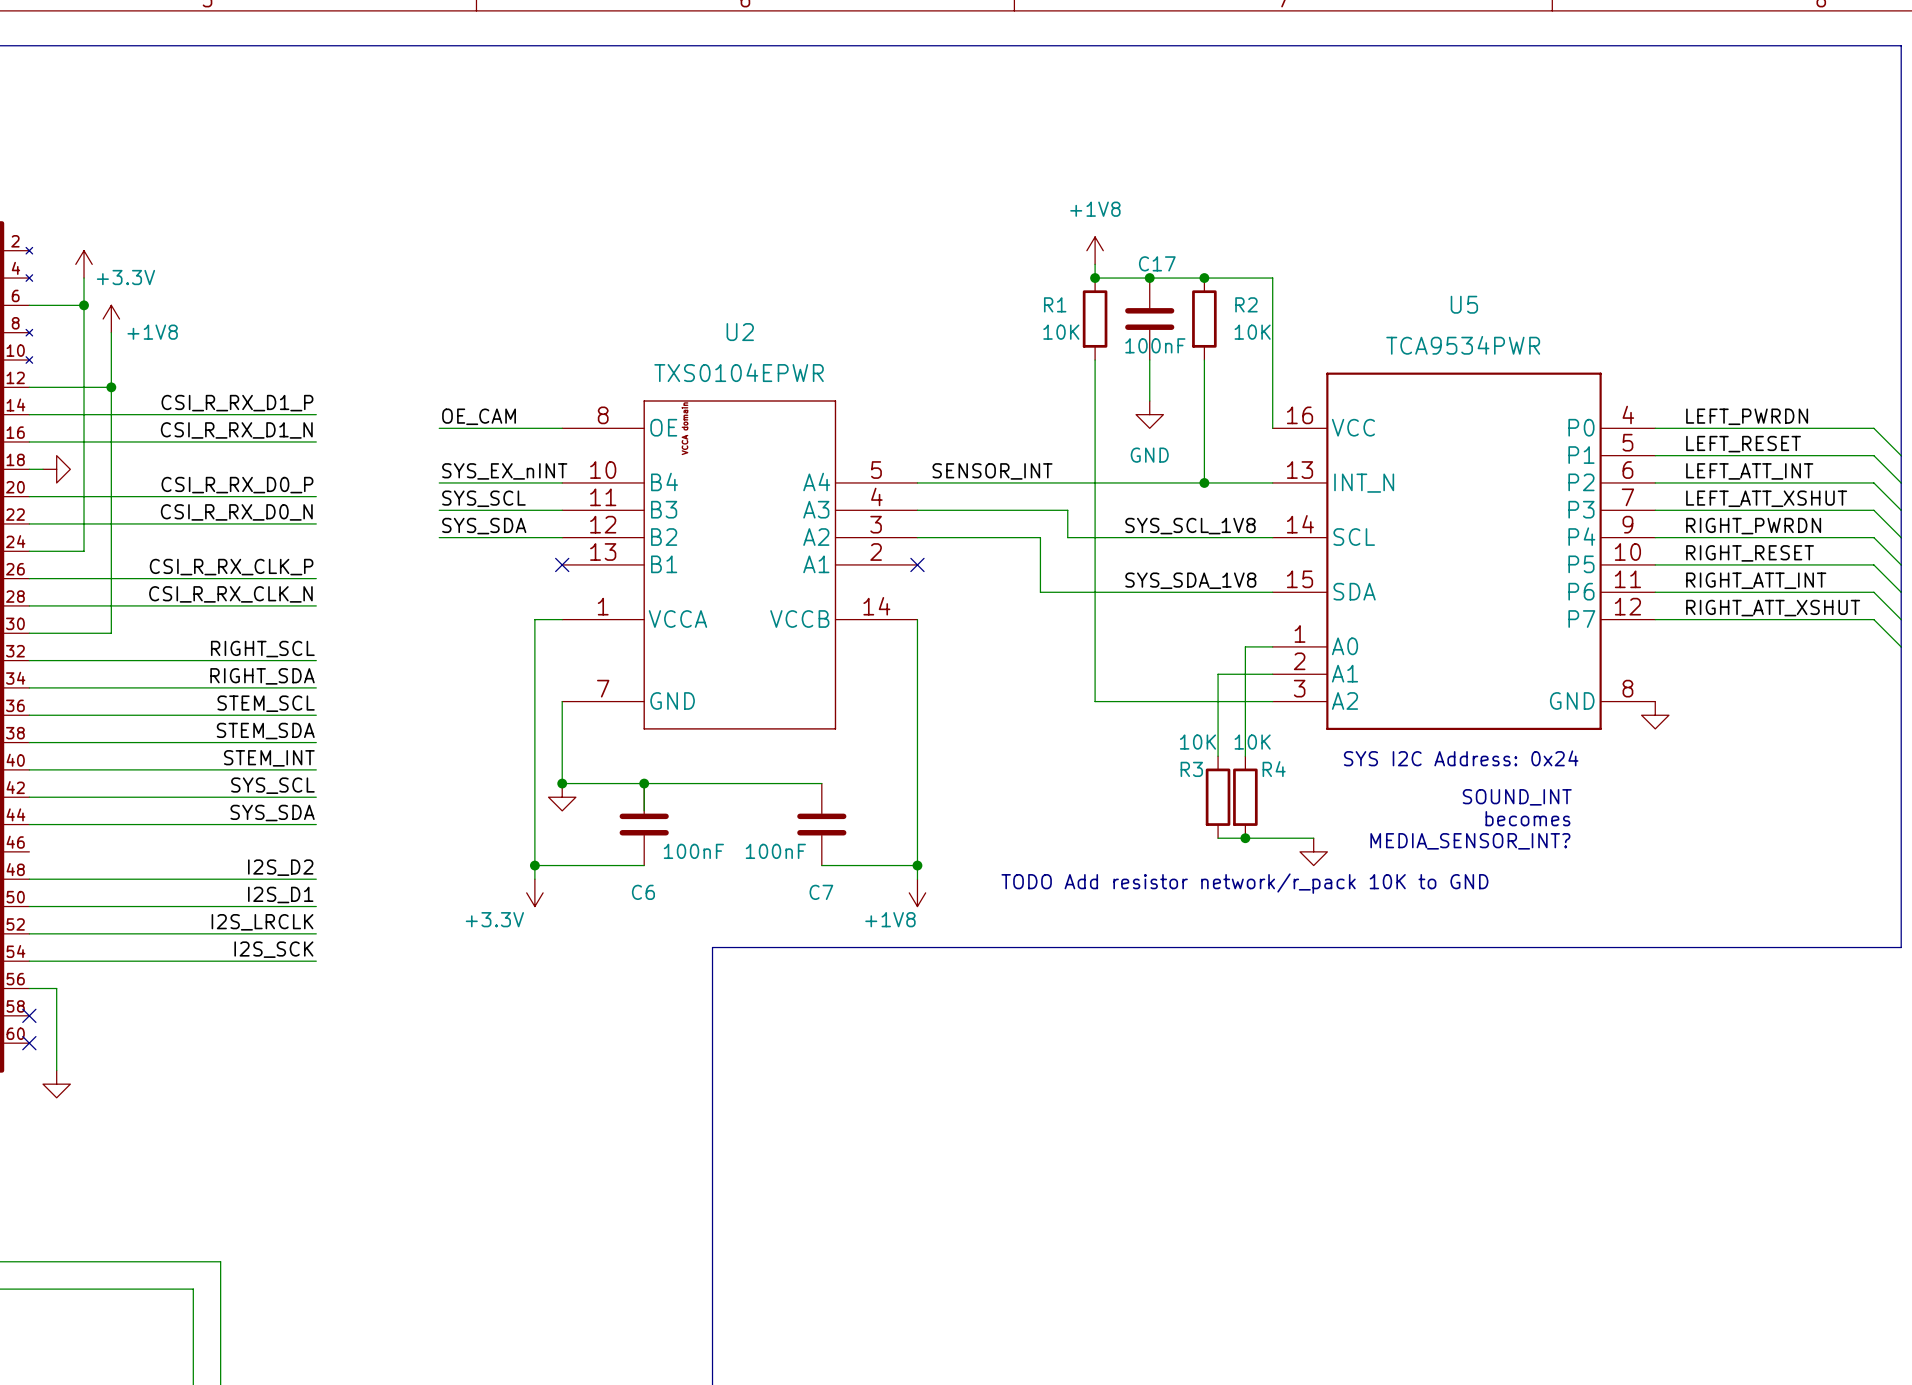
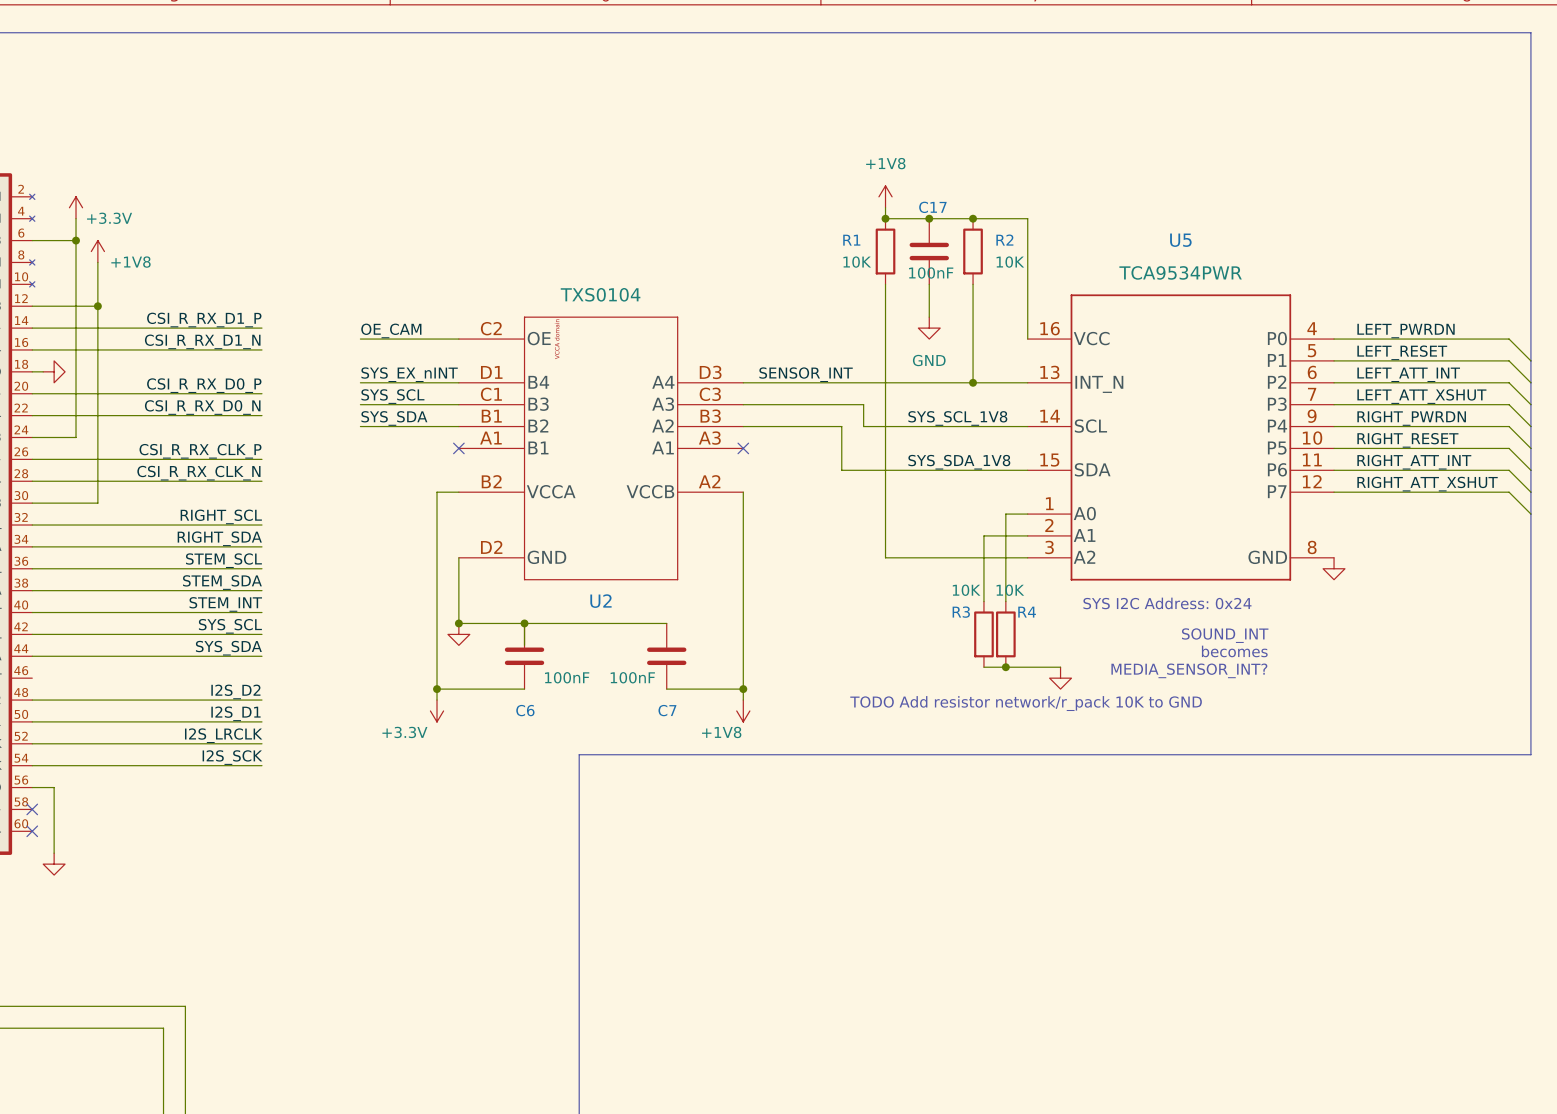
U2 name position: U2 (740, 332) -> U2 (600, 601)
U2 value: TXS0104EPWR (739, 372) -> TXS0104 (600, 294)
U2 symbol: [562, 400, 918, 730] -> [458, 316, 744, 581]

